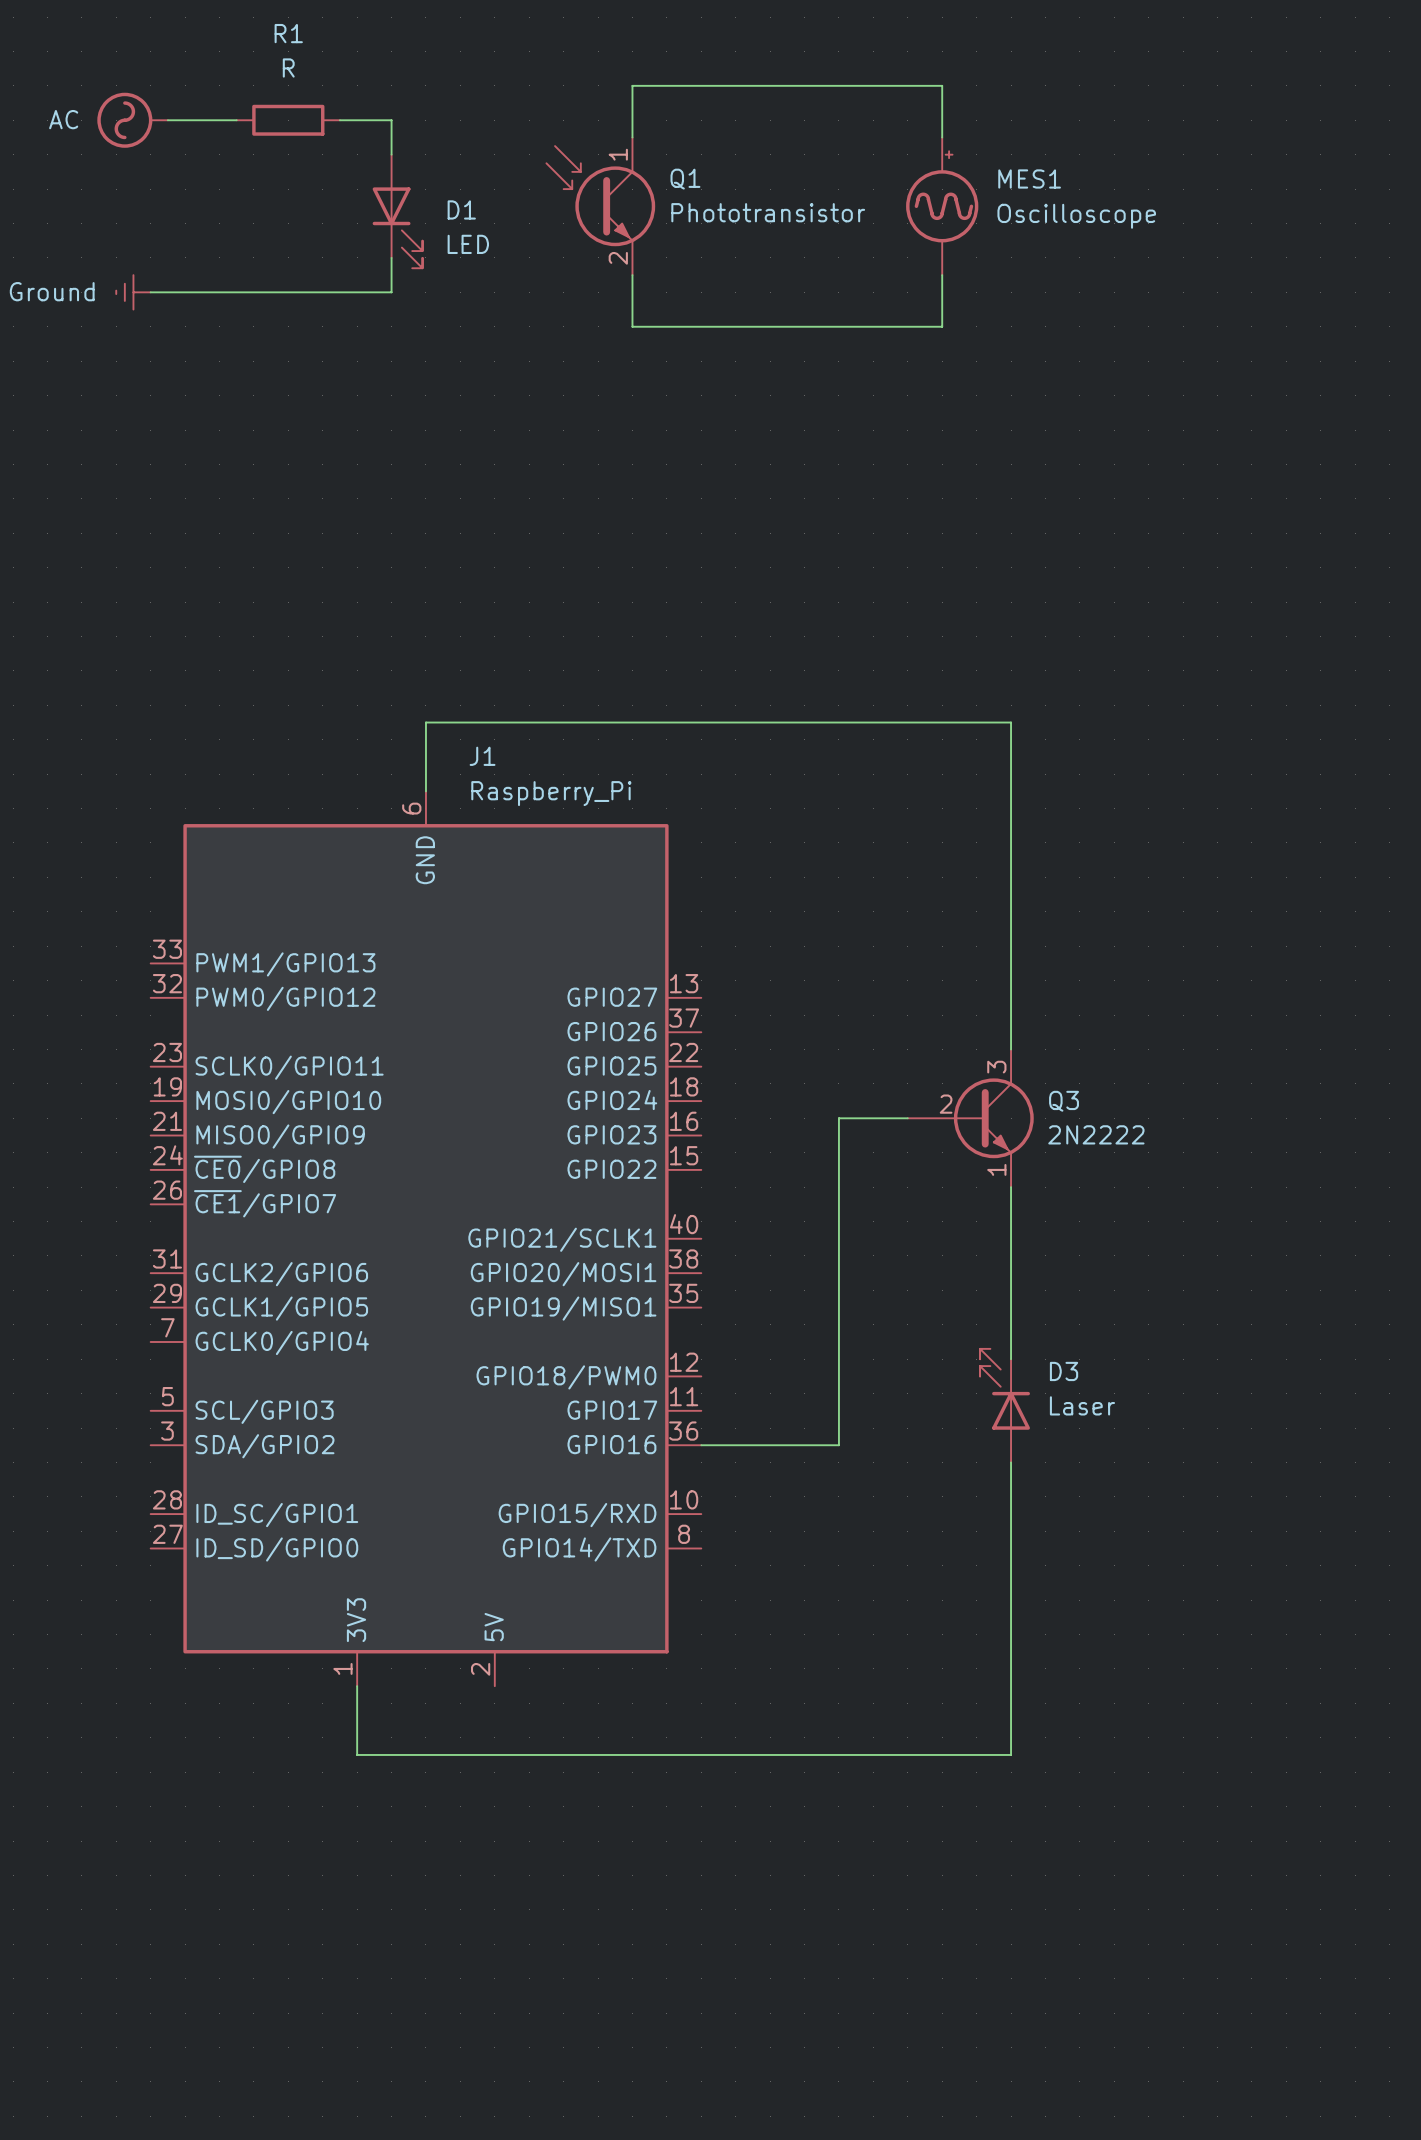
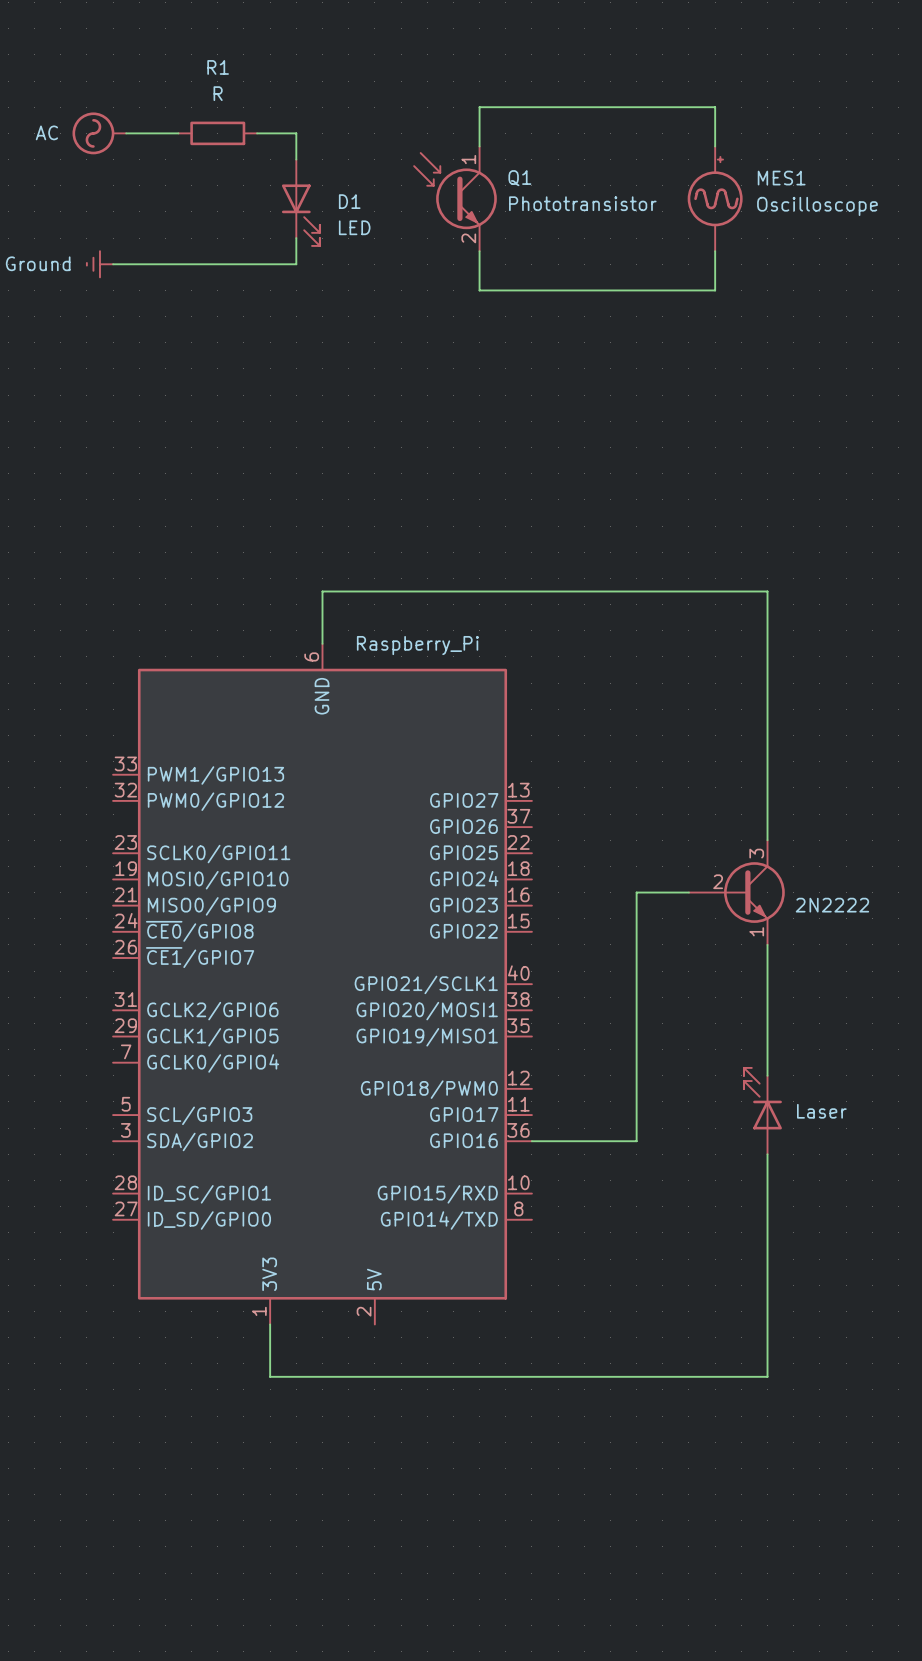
J1 name: J1 (482, 756) -> none
Q3 name: Q3 (1064, 1101) -> none
D3 name: D3 (1064, 1371) -> none

